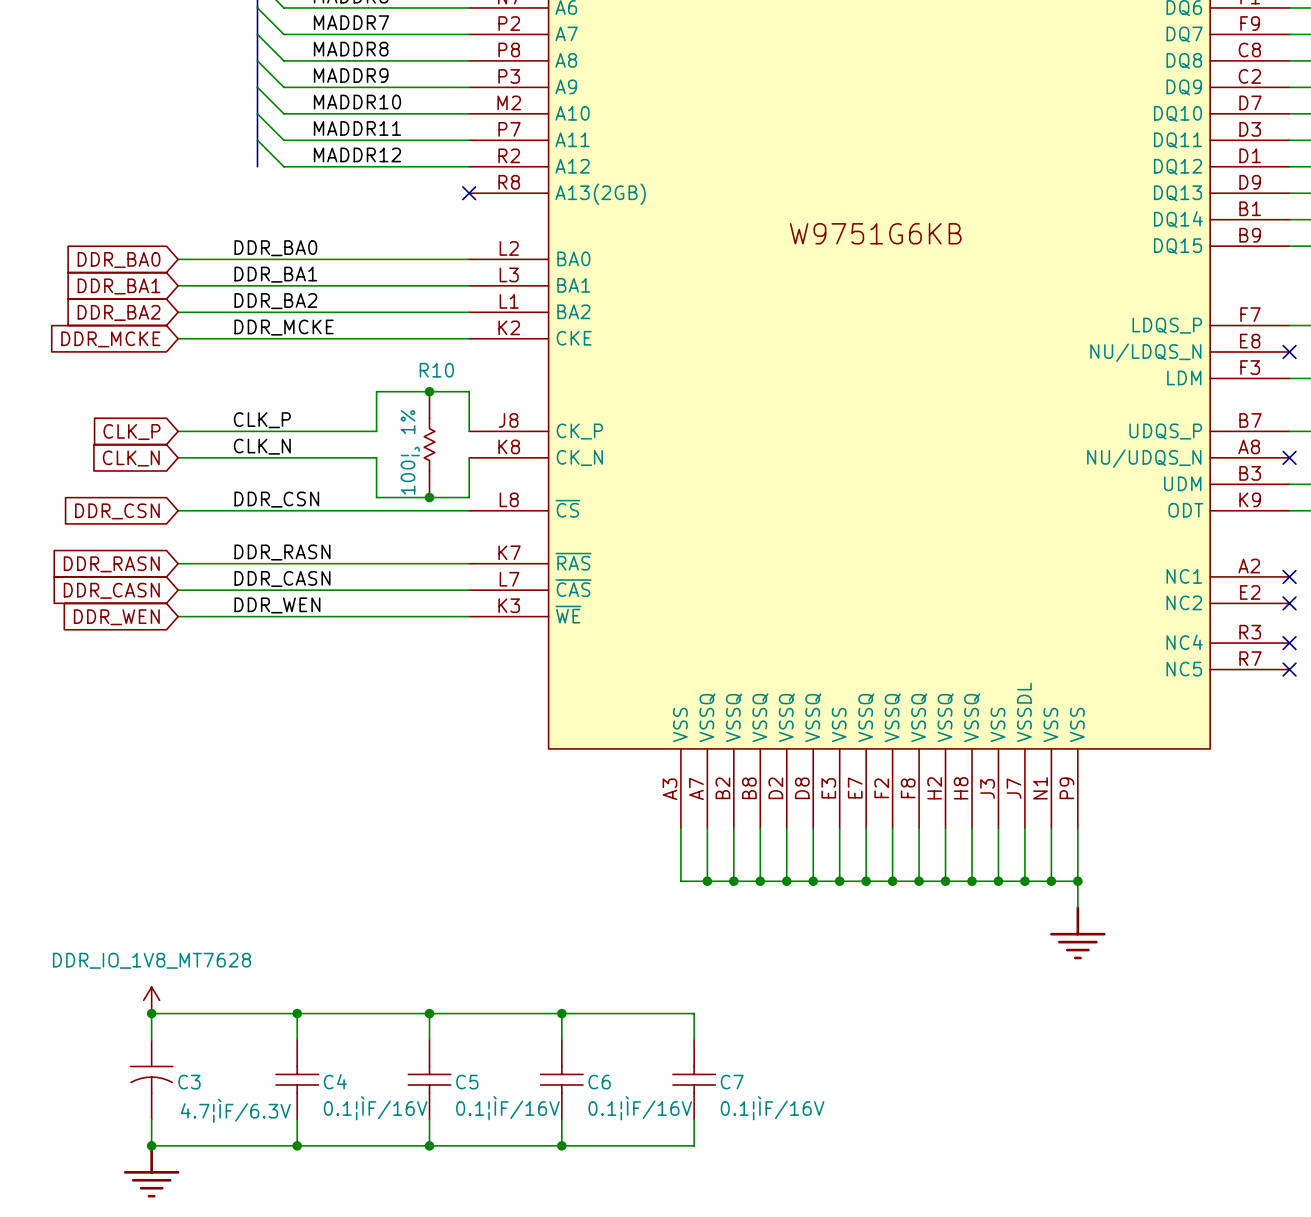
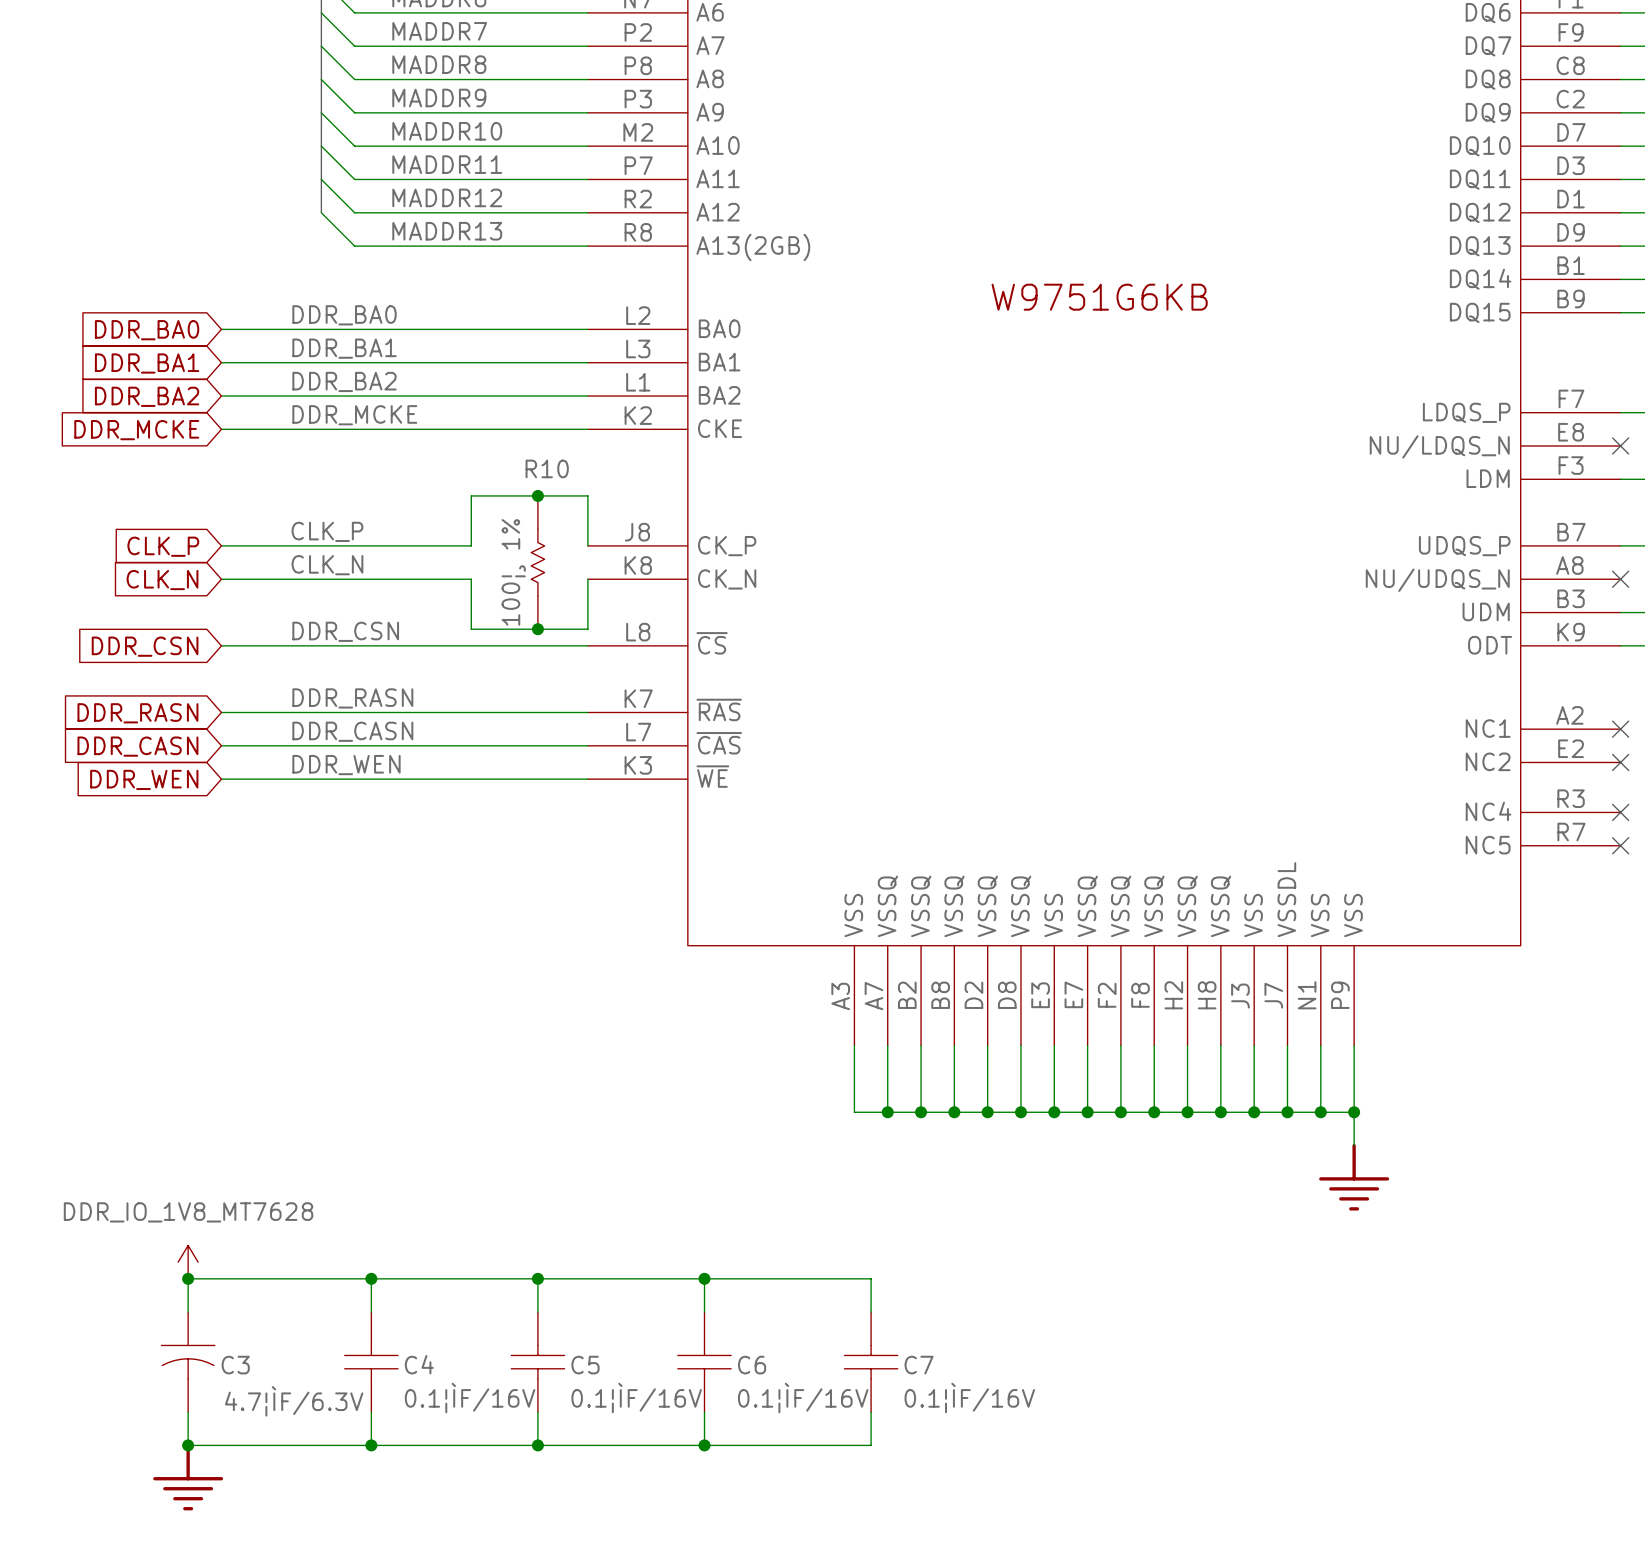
wire: none -> (321, 212) (354, 246) (587, 246)
label: none -> MADDR13 (447, 231)
no-connect mark: (469, 193) -> none

